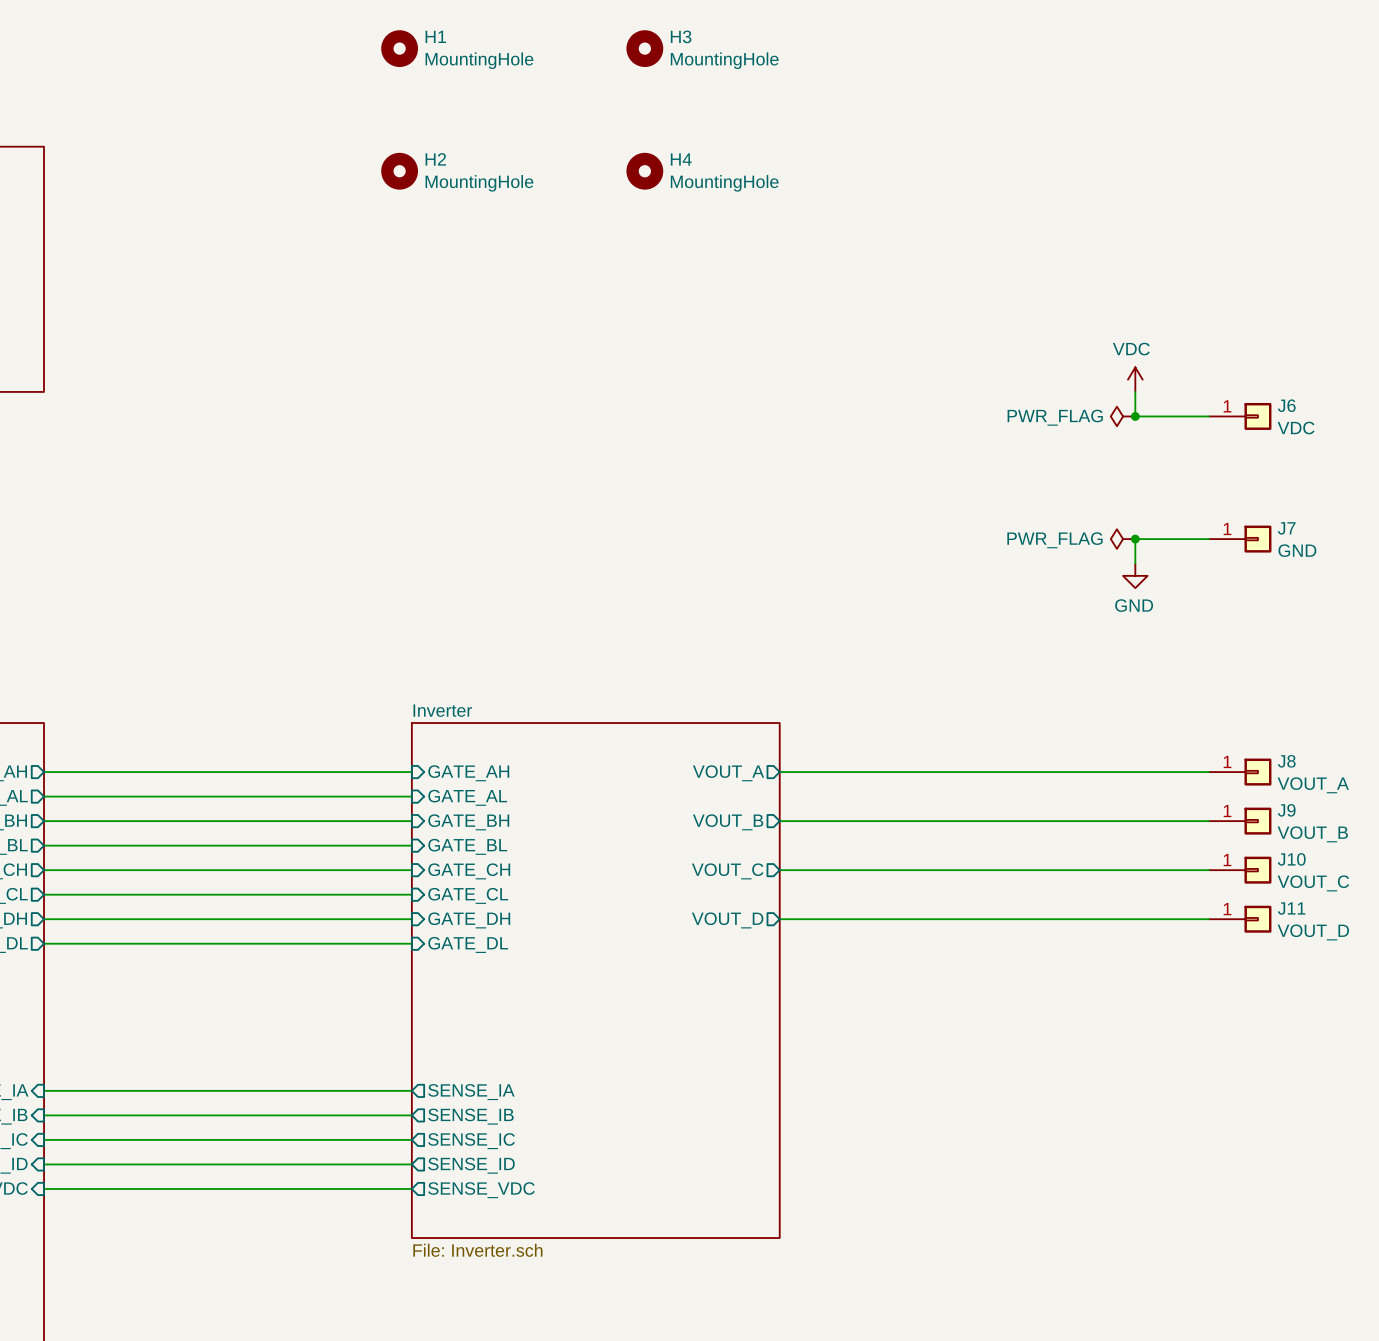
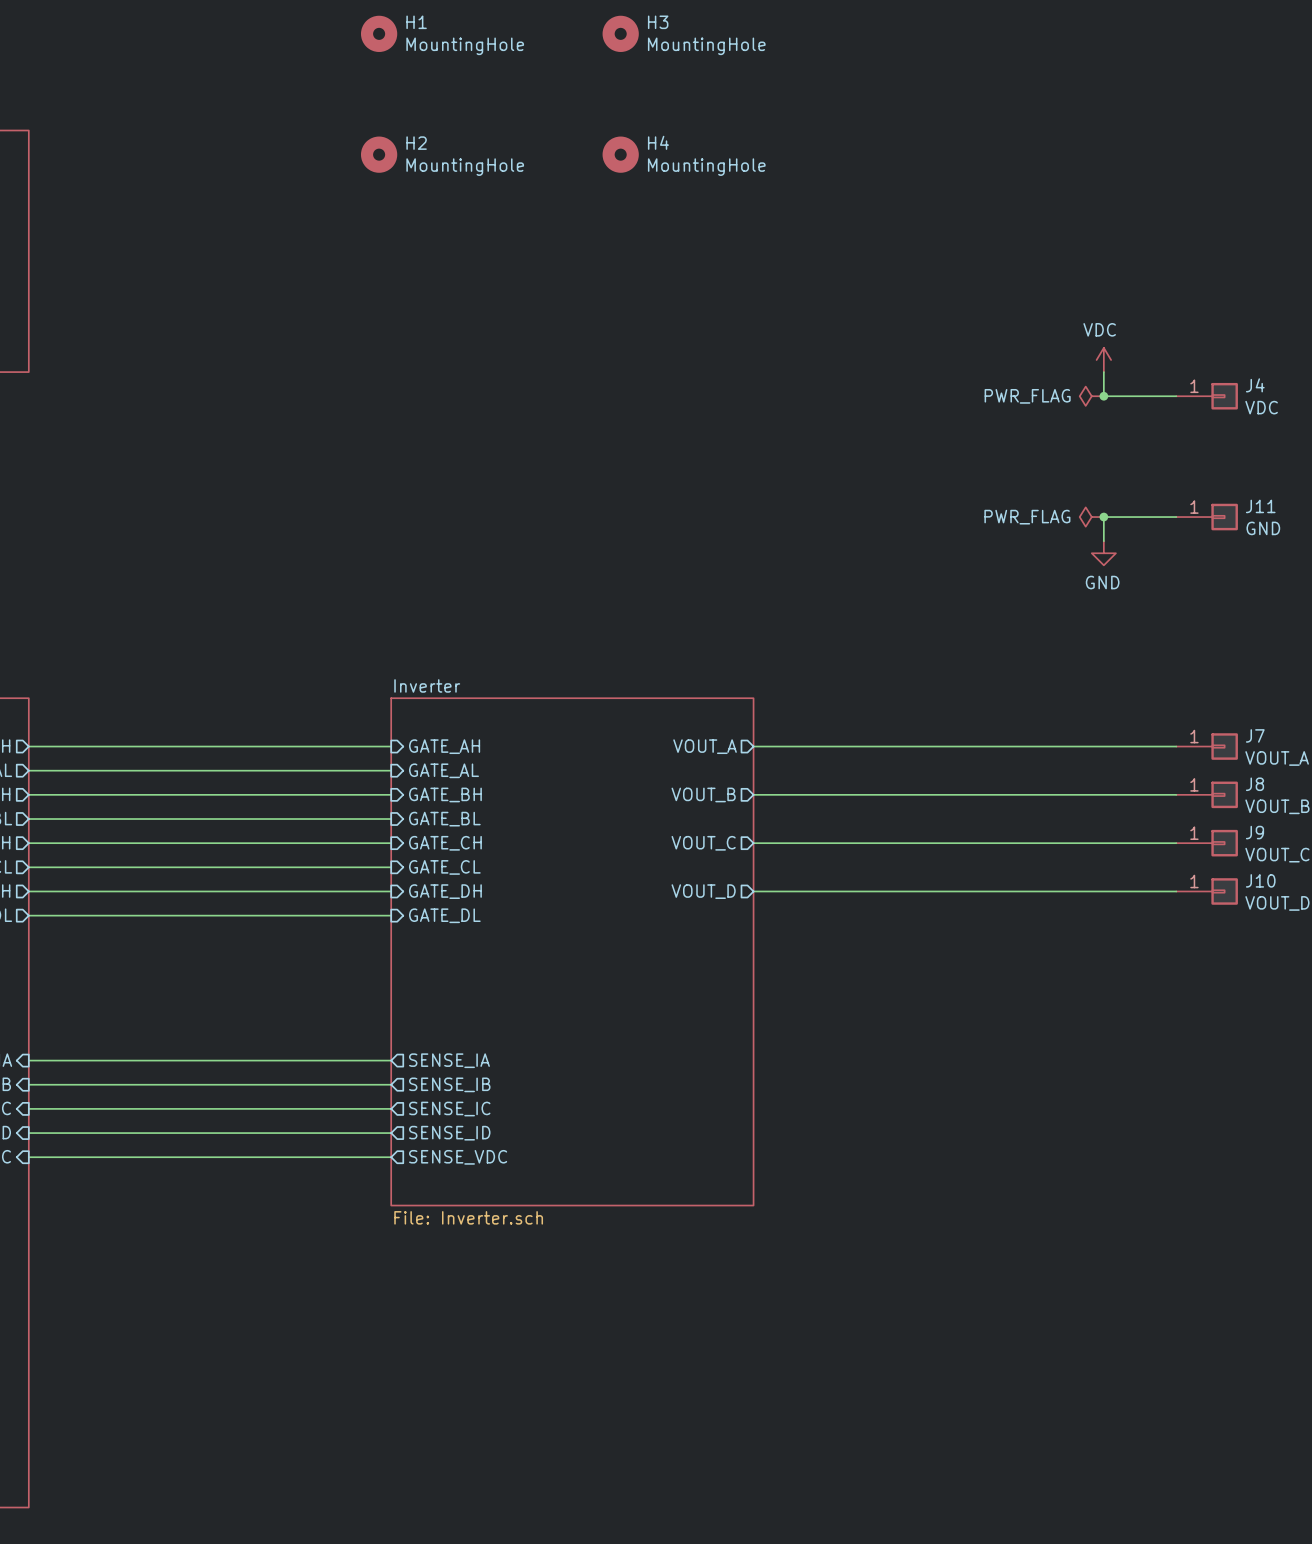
J6 name: J6 (1286, 405) -> J4 (1255, 385)
J7 name: J7 (1286, 528) -> J11 (1260, 506)
J8 name: J8 (1286, 761) -> J7 (1255, 735)
J9 name: J9 (1286, 810) -> J8 (1254, 784)
J10 name: J10 (1291, 859) -> J9 (1254, 832)
J11 name: J11 (1291, 908) -> J10 (1260, 880)

